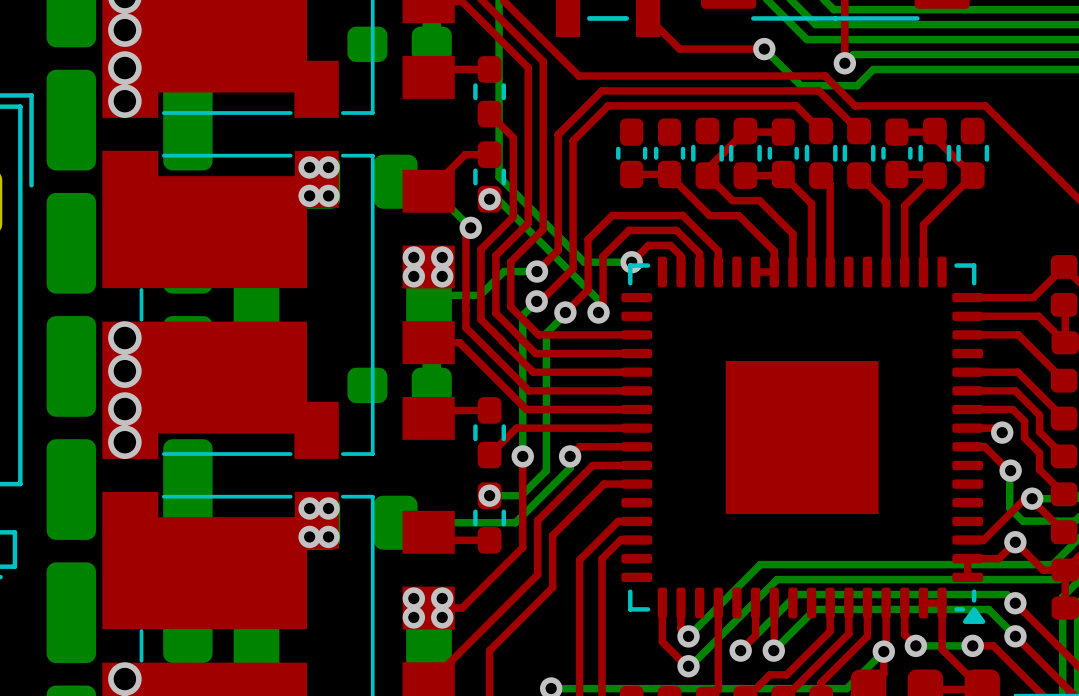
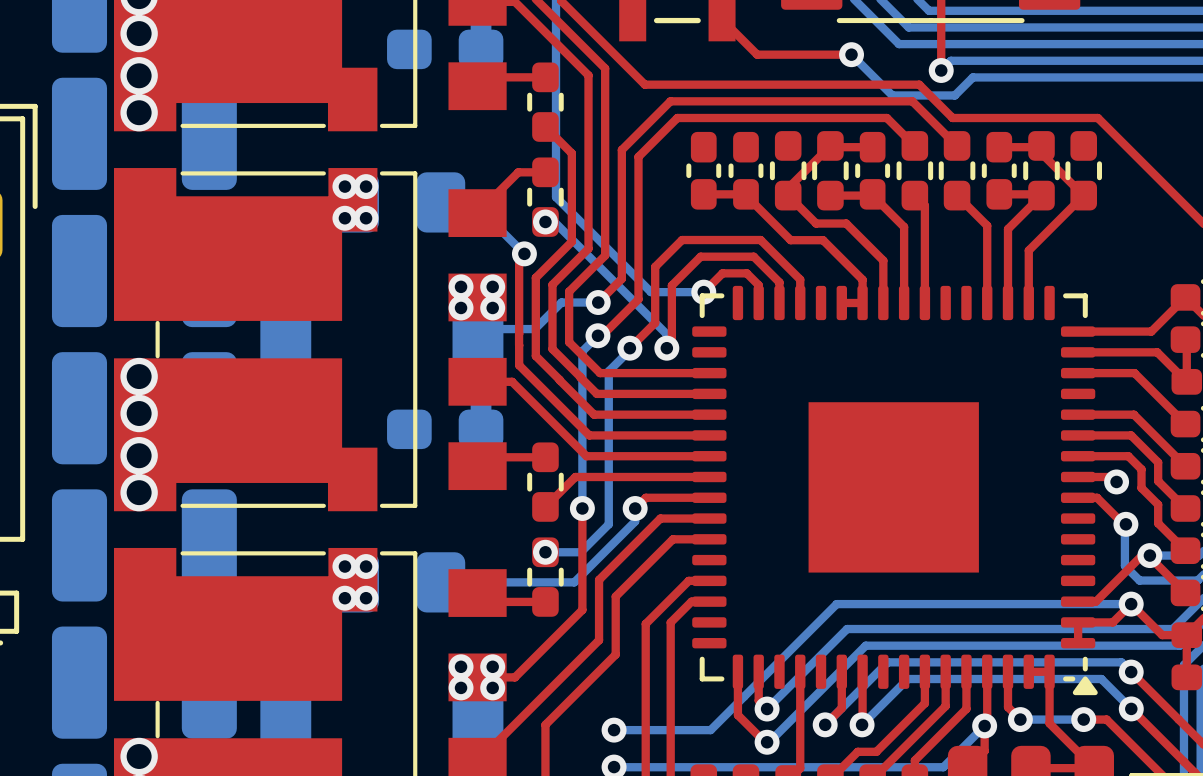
bottom track: none -> (1131, 604) (836, 604) (710, 730) (614, 730)
via: none -> (614, 730)

